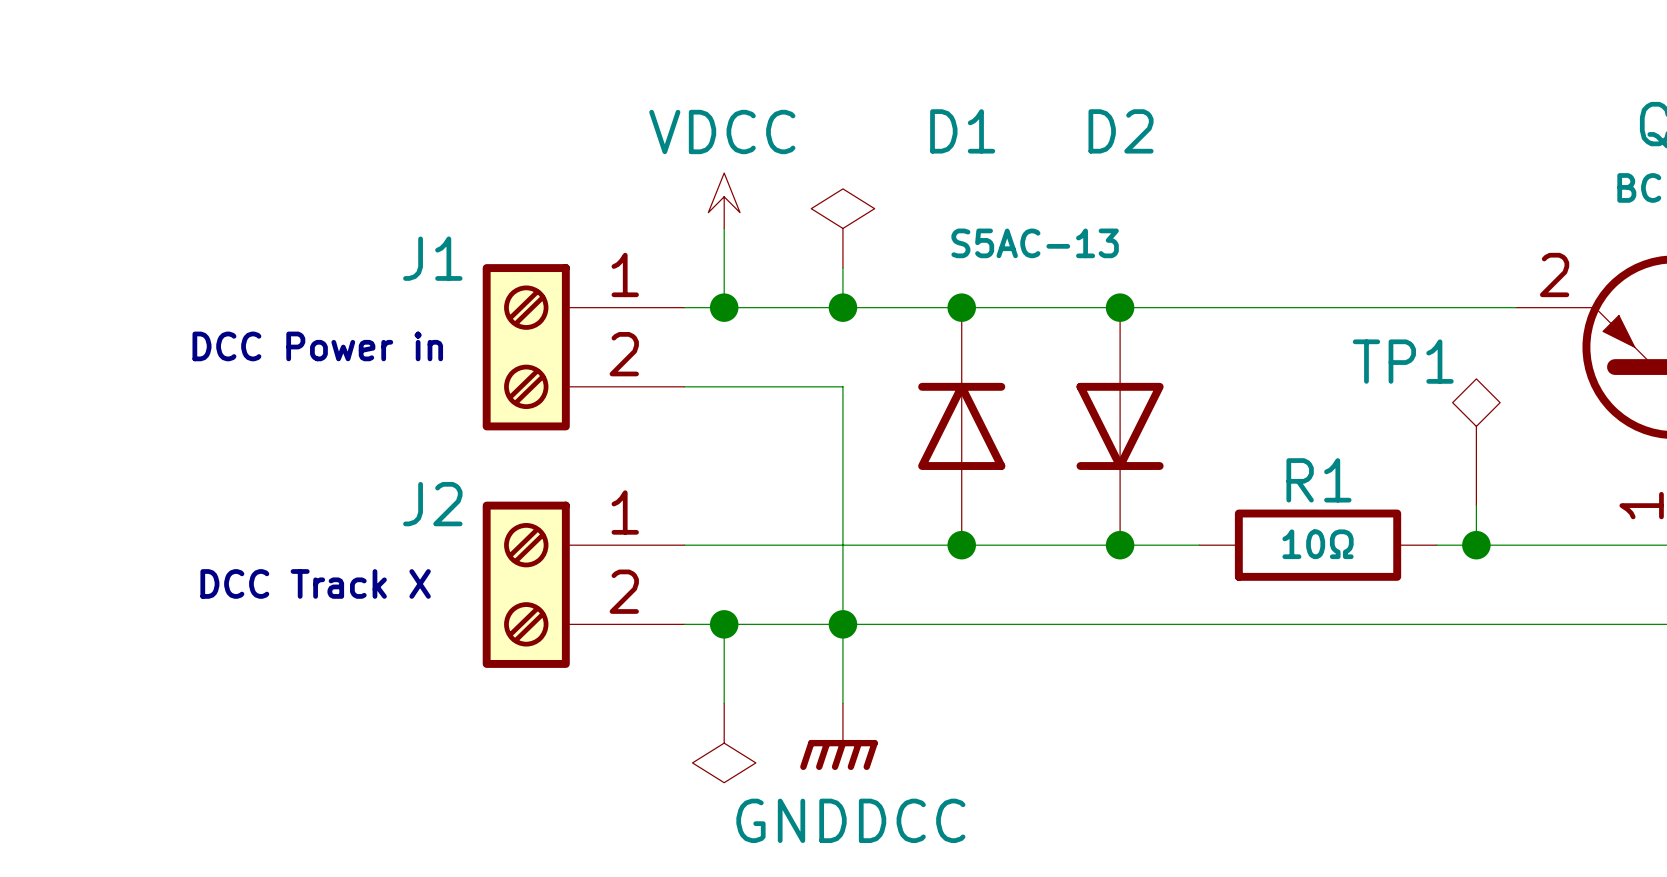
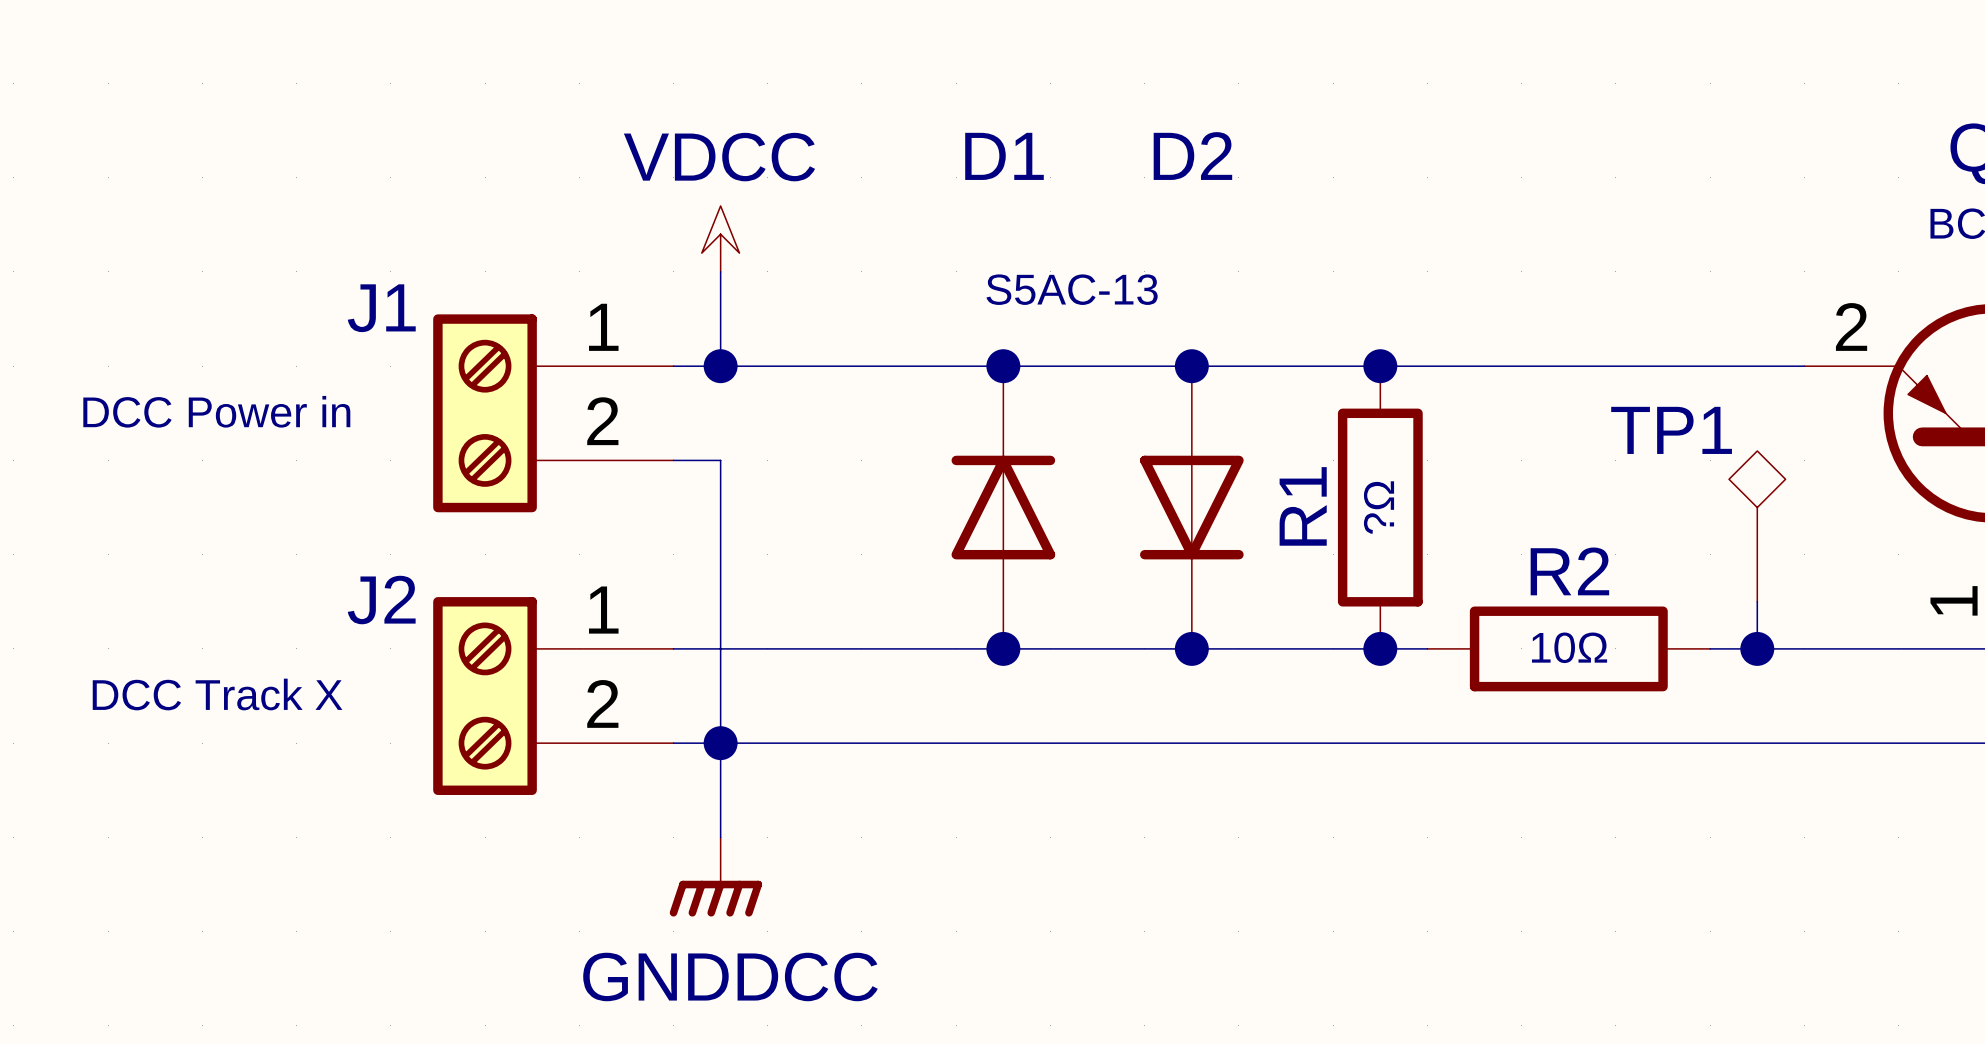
power symbol position: VDCC (724, 200) -> VDCC (720, 238)
wire: (724, 228) (724, 307) -> (720, 271) (720, 366)
power symbol: (842, 228) -> none
wire: (842, 268) (842, 307) -> none
junction position: (724, 307) -> (720, 366)
junction position: (961, 307) -> (1191, 366)
junction position: (1120, 307) -> (1380, 366)
text position: DCC Power in (317, 346) -> DCC Power in (216, 411)
J1 position: (583, 347) -> (553, 413)
wire: none -> (673, 460) (720, 460) (720, 837)
wire: (684, 386) (842, 386) (842, 703) -> none
D1 position: (961, 426) -> (1003, 507)
D2 position: (1120, 426) -> (1191, 507)
R1: none -> ?Ω (1380, 507)
R1 name: R1 (1318, 480) -> R2 (1569, 571)
junction: none -> (1003, 648)
junction position: (961, 545) -> (1191, 648)
junction position: (1120, 545) -> (1380, 648)
text position: DCC Track X (315, 583) -> DCC Track X (217, 694)
J2 position: (583, 584) -> (553, 696)
junction: none -> (720, 743)
wire: (724, 624) (724, 703) -> none
junction: (724, 624) -> none
junction: (842, 624) -> none
power symbol position: GNDDCC (839, 736) -> GNDDCC (715, 876)
power symbol: (724, 743) -> none

